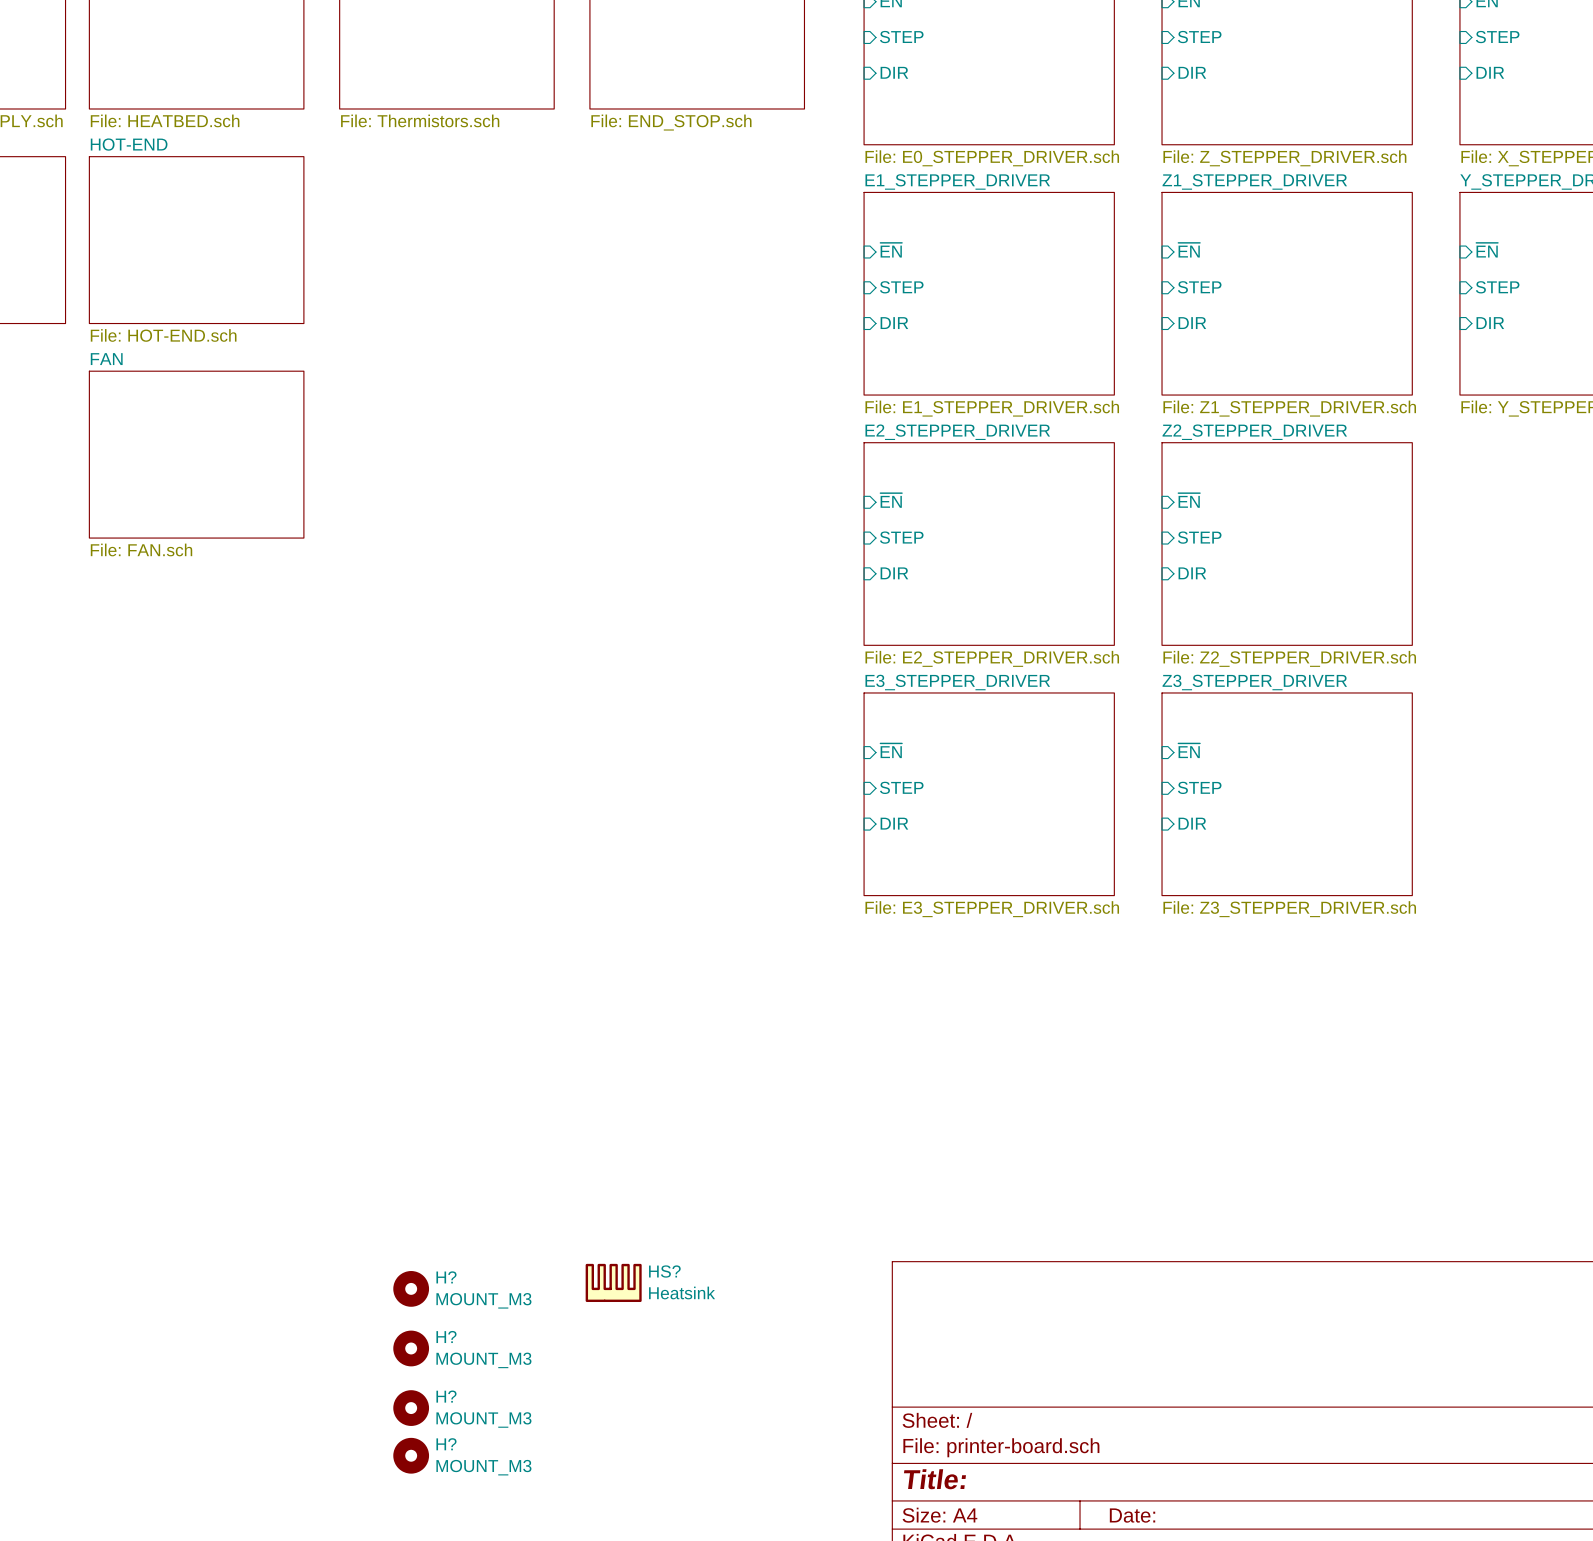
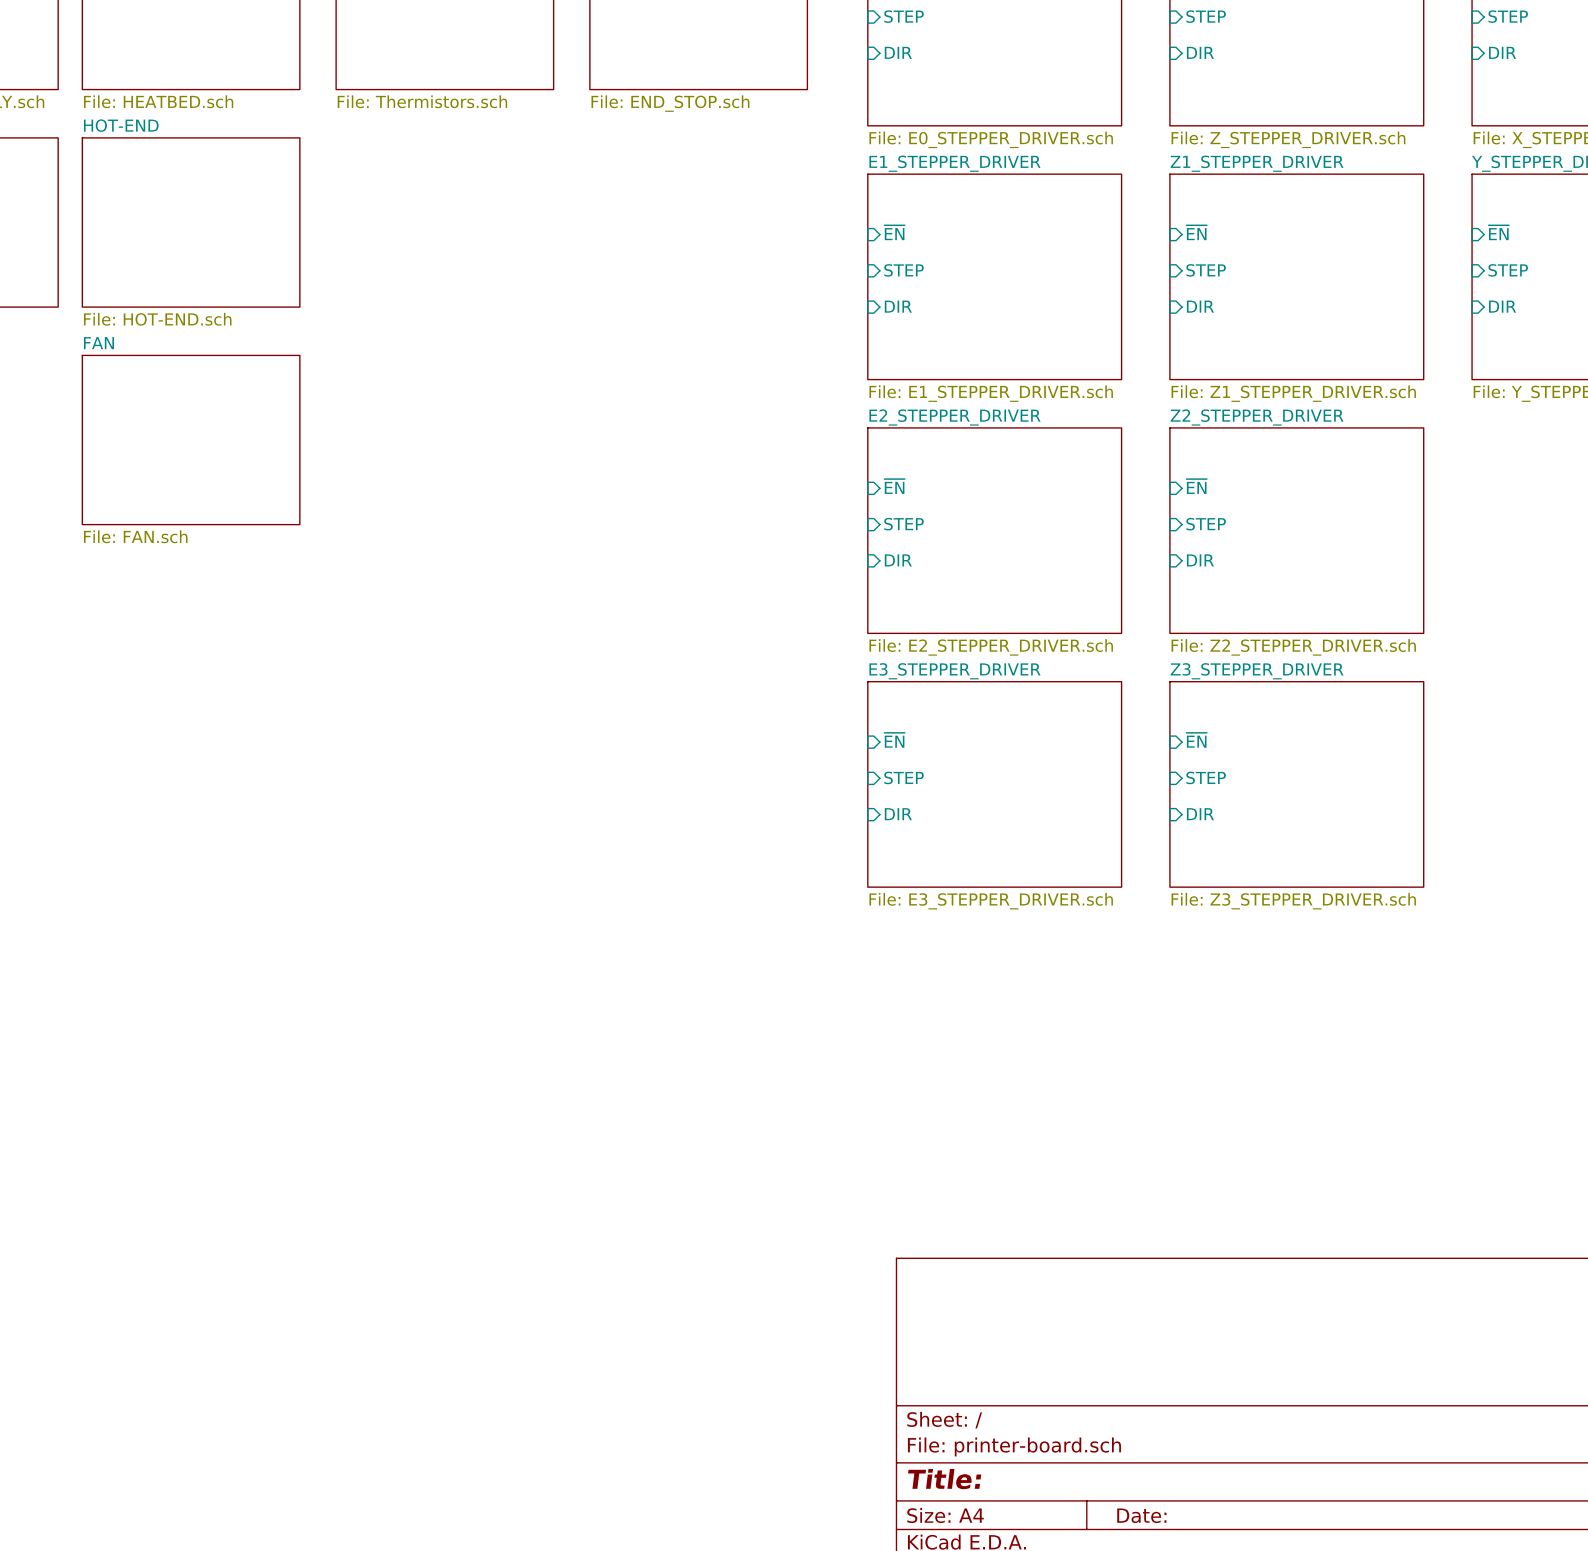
HS?: Heatsink (613, 1282) -> none
H?: MOUNT_M3 (411, 1288) -> none
H?: MOUNT_M3 (411, 1348) -> none
H?: MOUNT_M3 (411, 1408) -> none
H?: MOUNT_M3 (411, 1455) -> none

